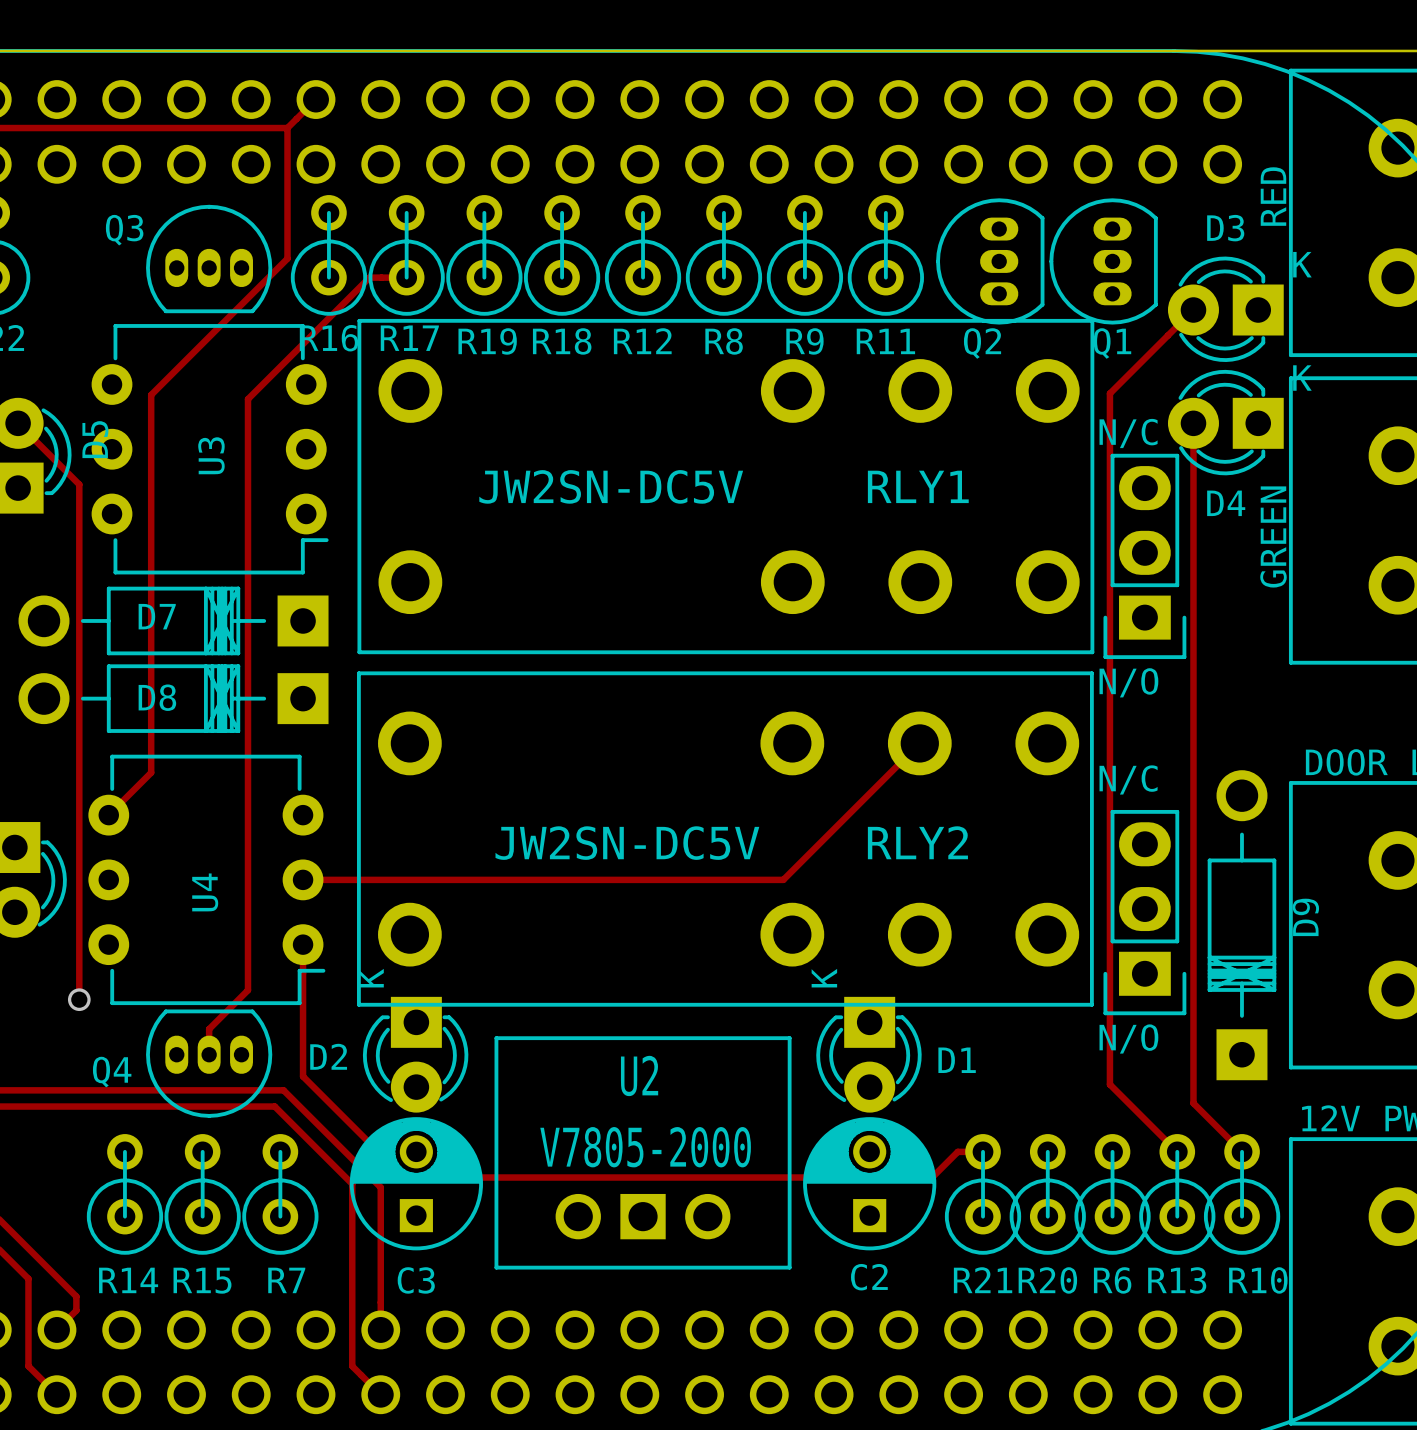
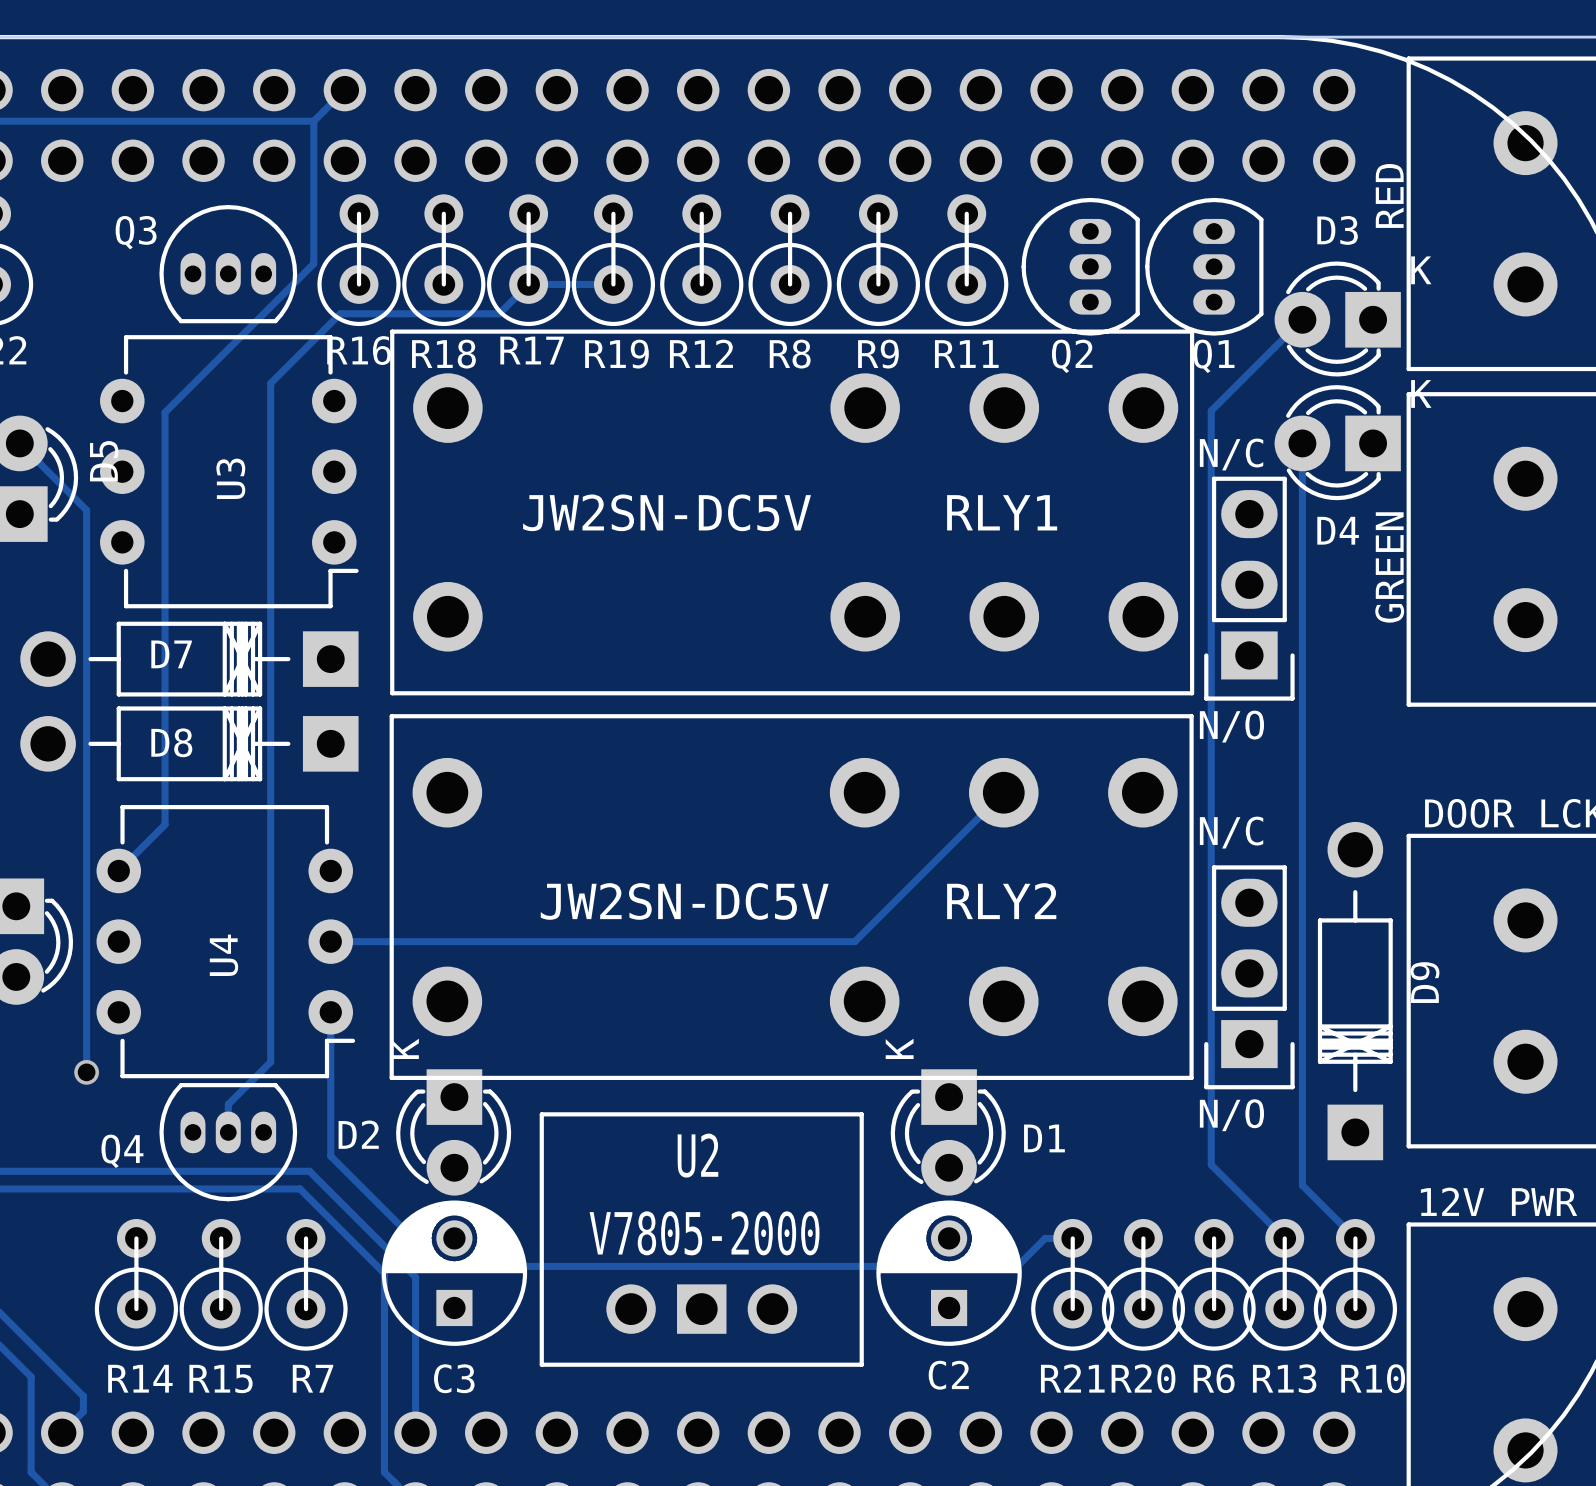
track: (406, 277) (369, 277) (248, 399) -> (616, 284) (528, 284) (499, 313) (340, 313) (270, 383) (270, 417)
R17 name: R17 (409, 338) -> R18 (443, 354)
R19 name: R19 (487, 341) -> R17 (532, 350)
R18 name: R18 (562, 341) -> R19 (616, 354)

